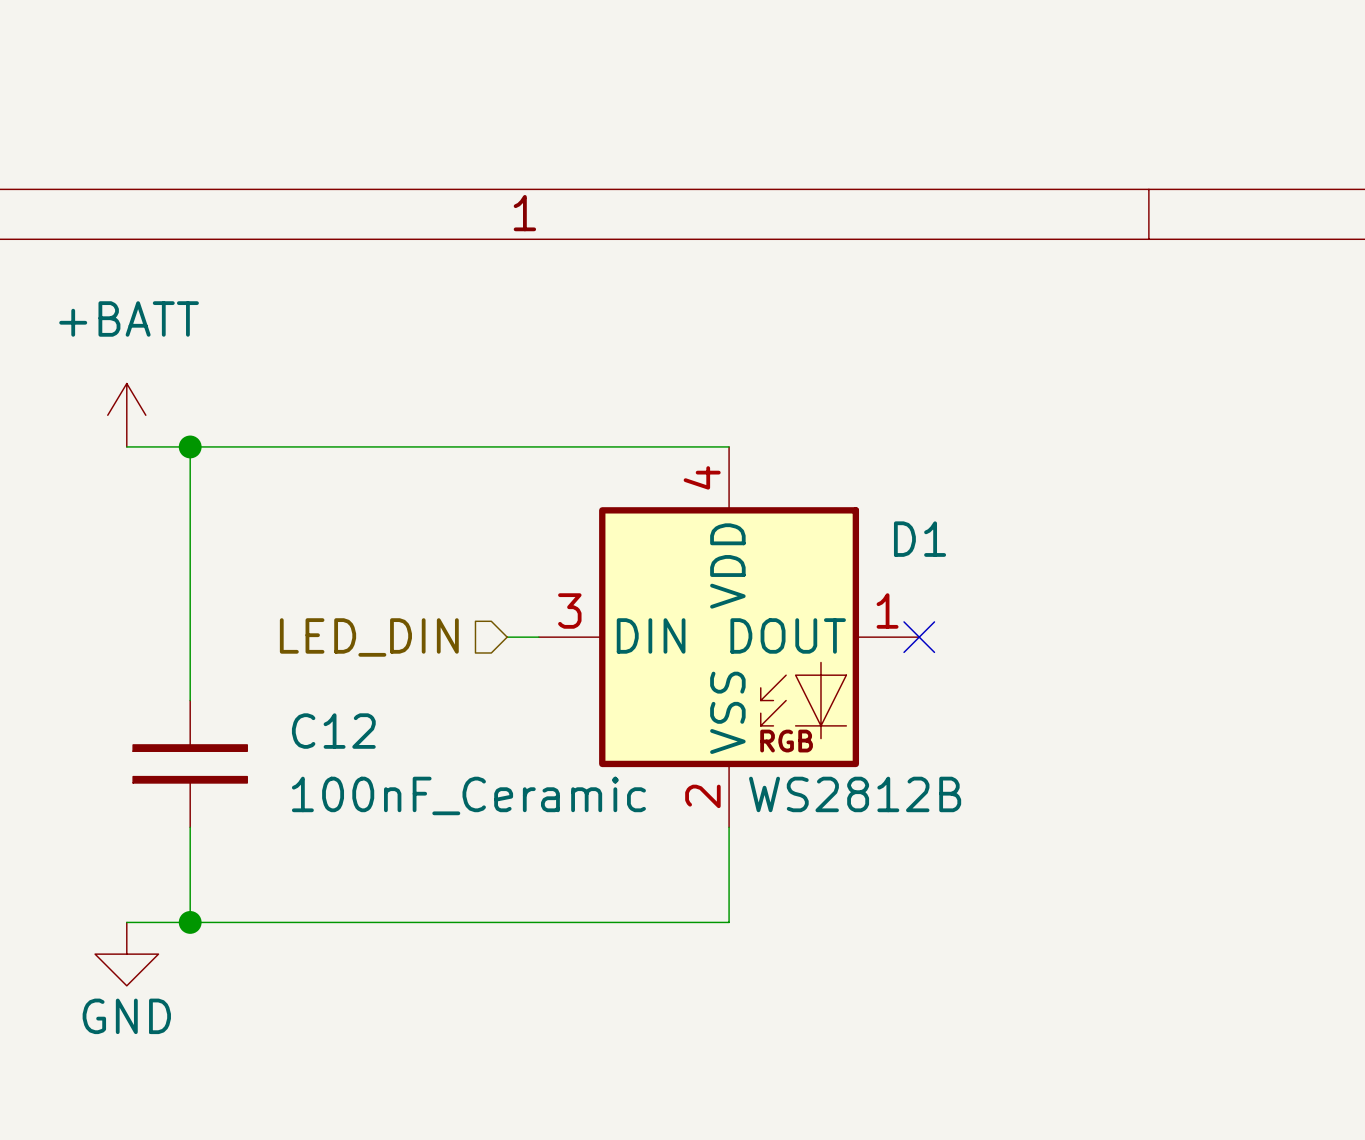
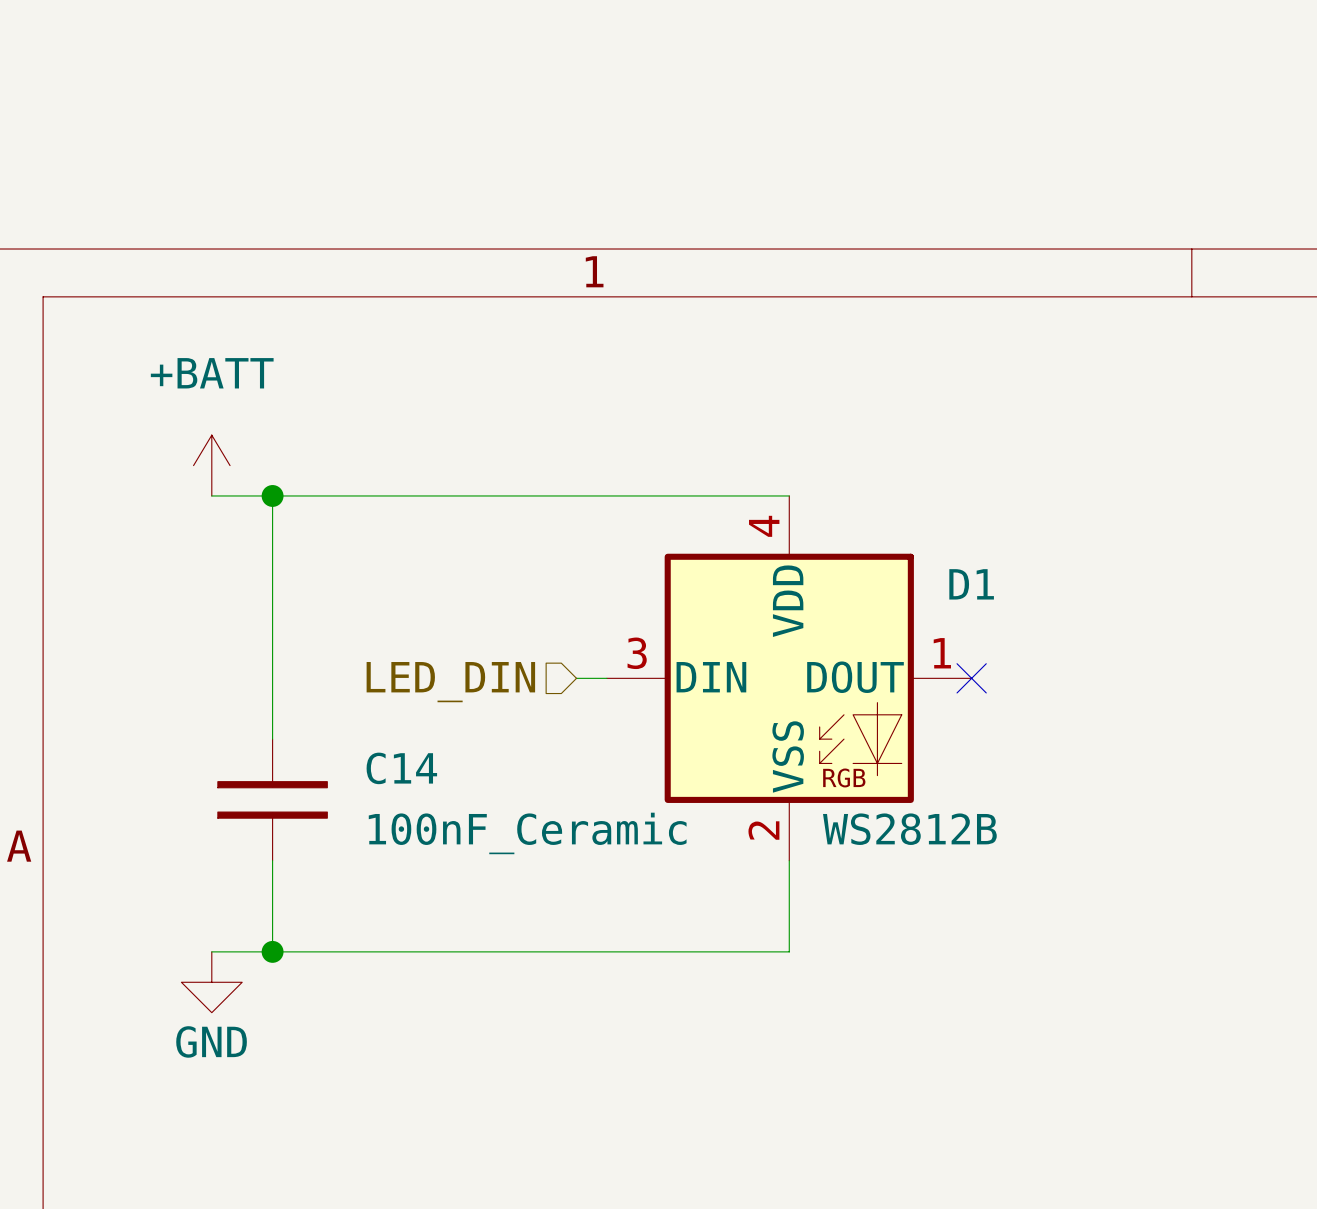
C12 name: C12 (333, 731) -> C14 (401, 768)

